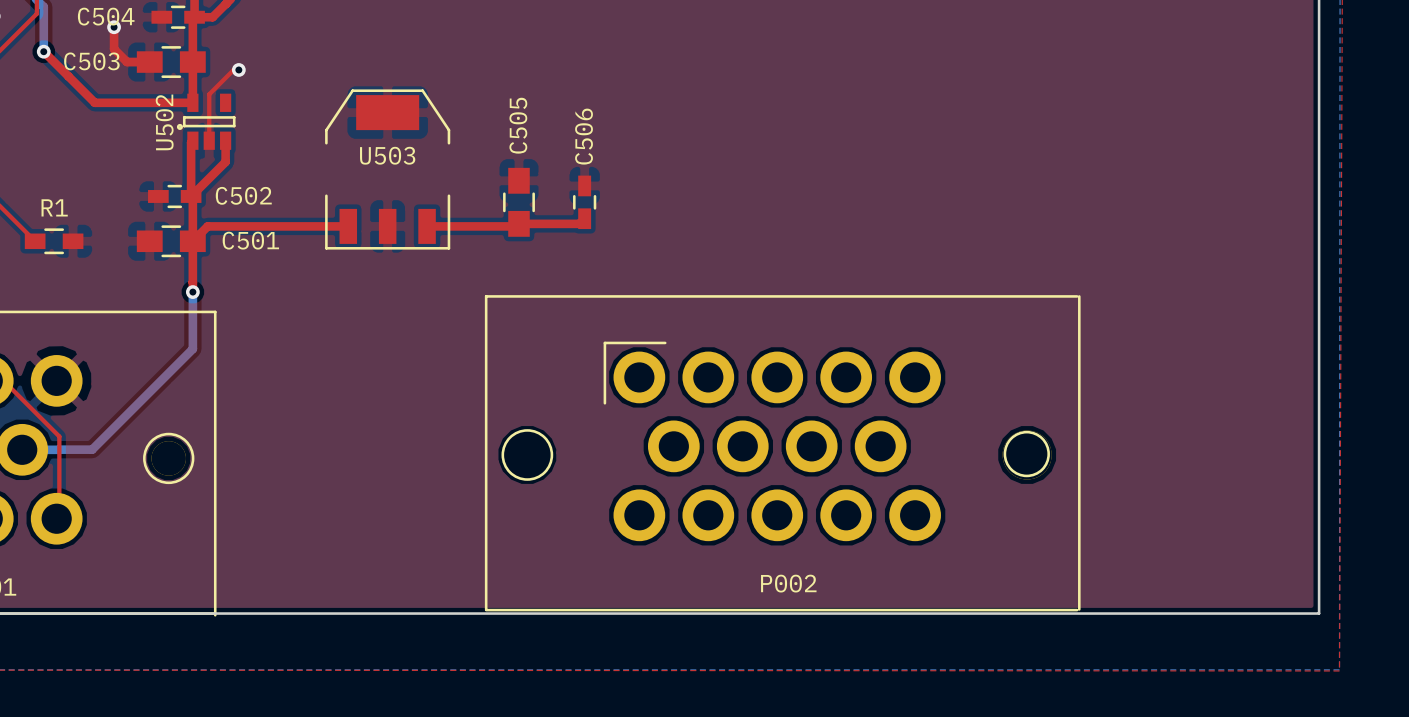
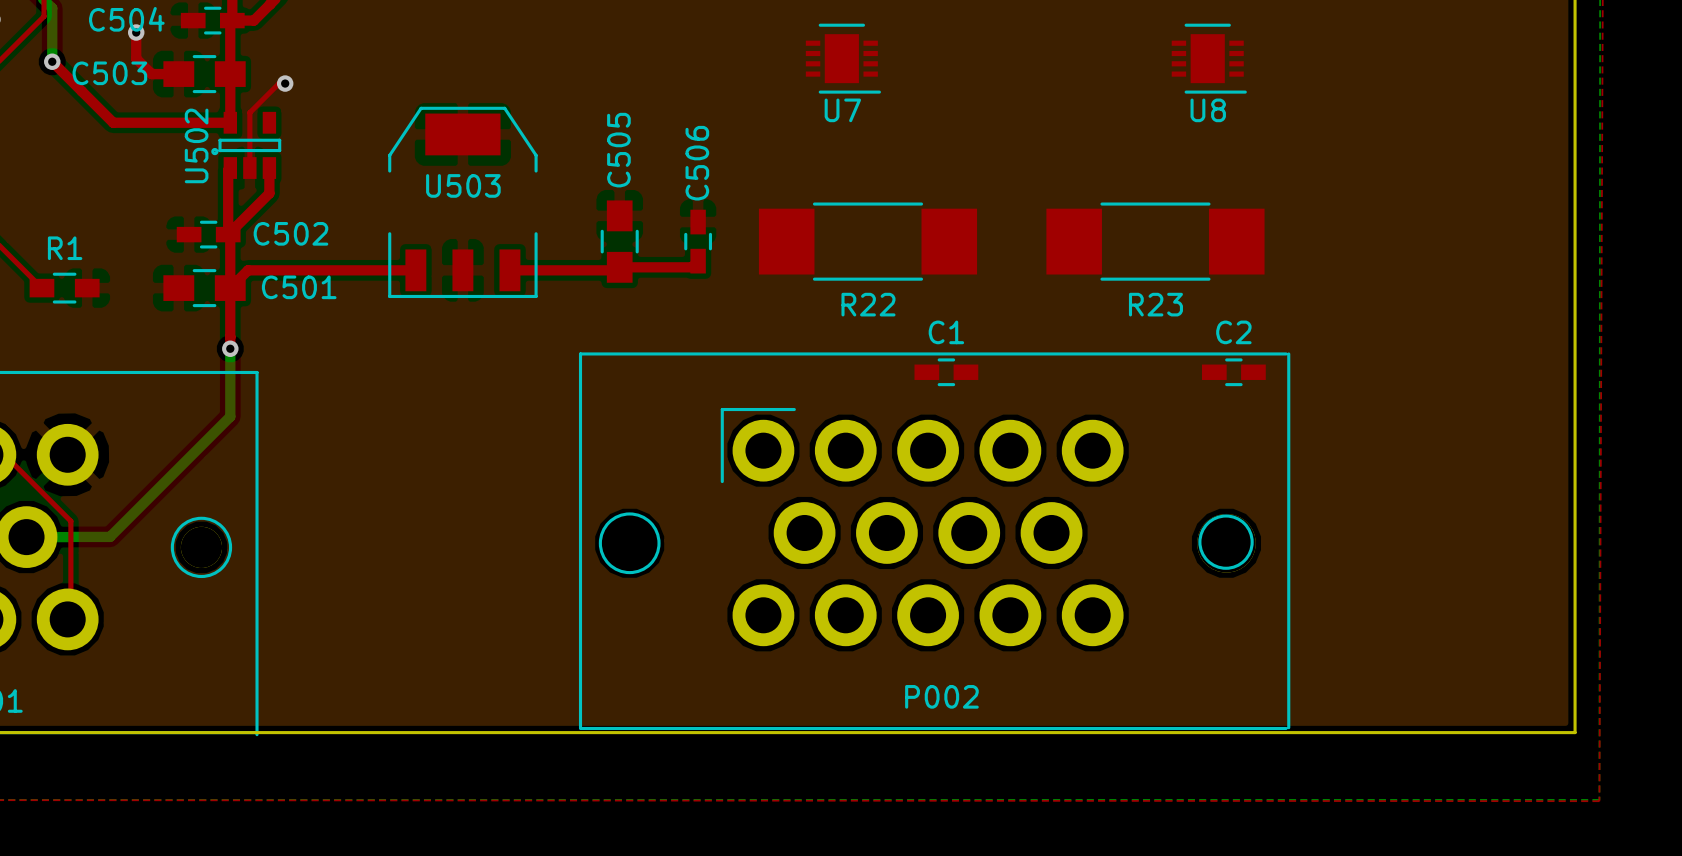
U7: none -> (843, 58)
U8: none -> (1209, 58)
R22: none -> (867, 241)
R23: none -> (1155, 241)
C1: none -> (946, 372)
C2: none -> (1233, 372)

